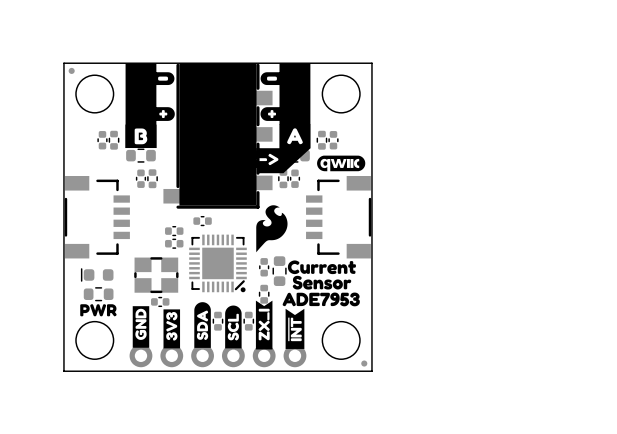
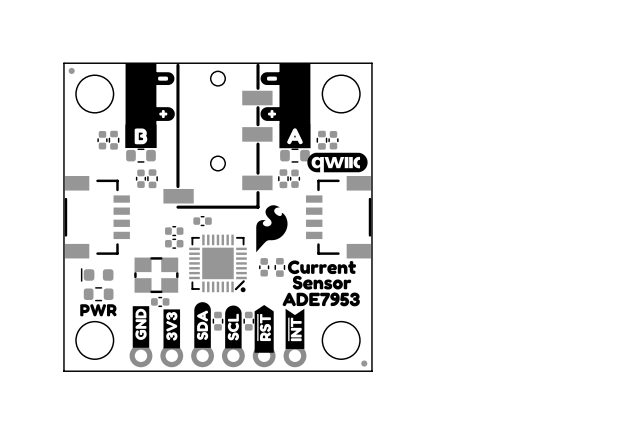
drawing: [179, 63, 311, 206] -> none
drawing shape: [317, 155, 366, 172] -> [307, 152, 368, 173]
part footprint: [272, 256, 287, 286] -> [274, 257, 286, 277]
part: (264, 294) -> none
drawing shape: [255, 300, 273, 350] -> [254, 304, 274, 353]

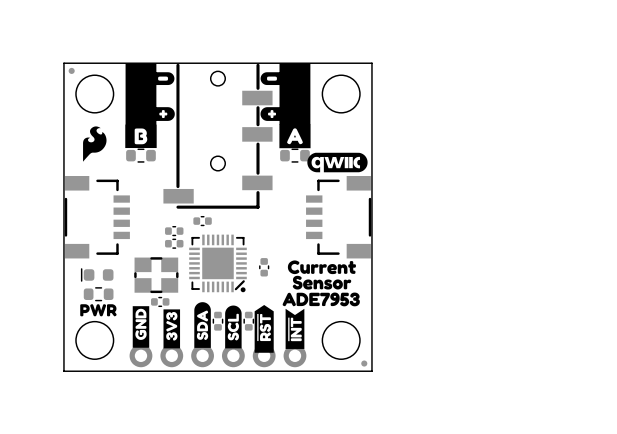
drawing: none -> [83, 126, 107, 162]
part: (102, 140) -> none
part: (114, 140) -> none
part: (321, 140) -> none
part: (333, 140) -> none
part: (140, 178) -> none
part: (152, 178) -> none
part: (283, 178) -> none
part: (294, 178) -> none
drawing: [256, 205, 288, 253] -> none
part: (279, 267) -> none

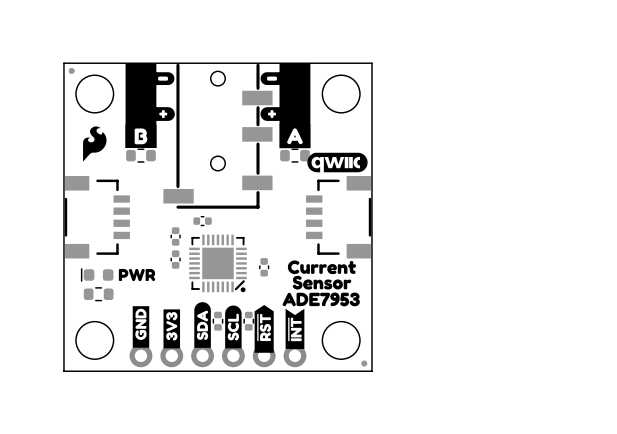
part: (174, 231) -> none
part: none -> (175, 236)
part: (174, 243) -> none
part: none -> (175, 259)
part: (156, 275) -> none
part: (160, 301) -> none
drawing position: (98, 310) -> (137, 275)

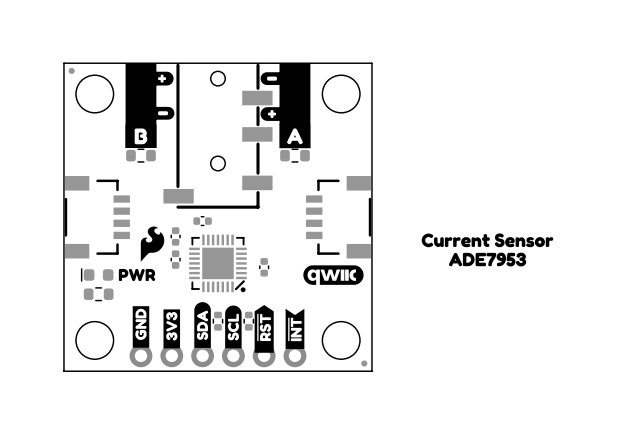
drawing position: (164, 78) -> (164, 113)
drawing position: (165, 114) -> (164, 78)
drawing position: (94, 144) -> (152, 244)
drawing position: (337, 162) -> (333, 275)
drawing: none -> [421, 233, 554, 248]
drawing: [287, 260, 356, 290] -> none
drawing position: (321, 299) -> (487, 259)

